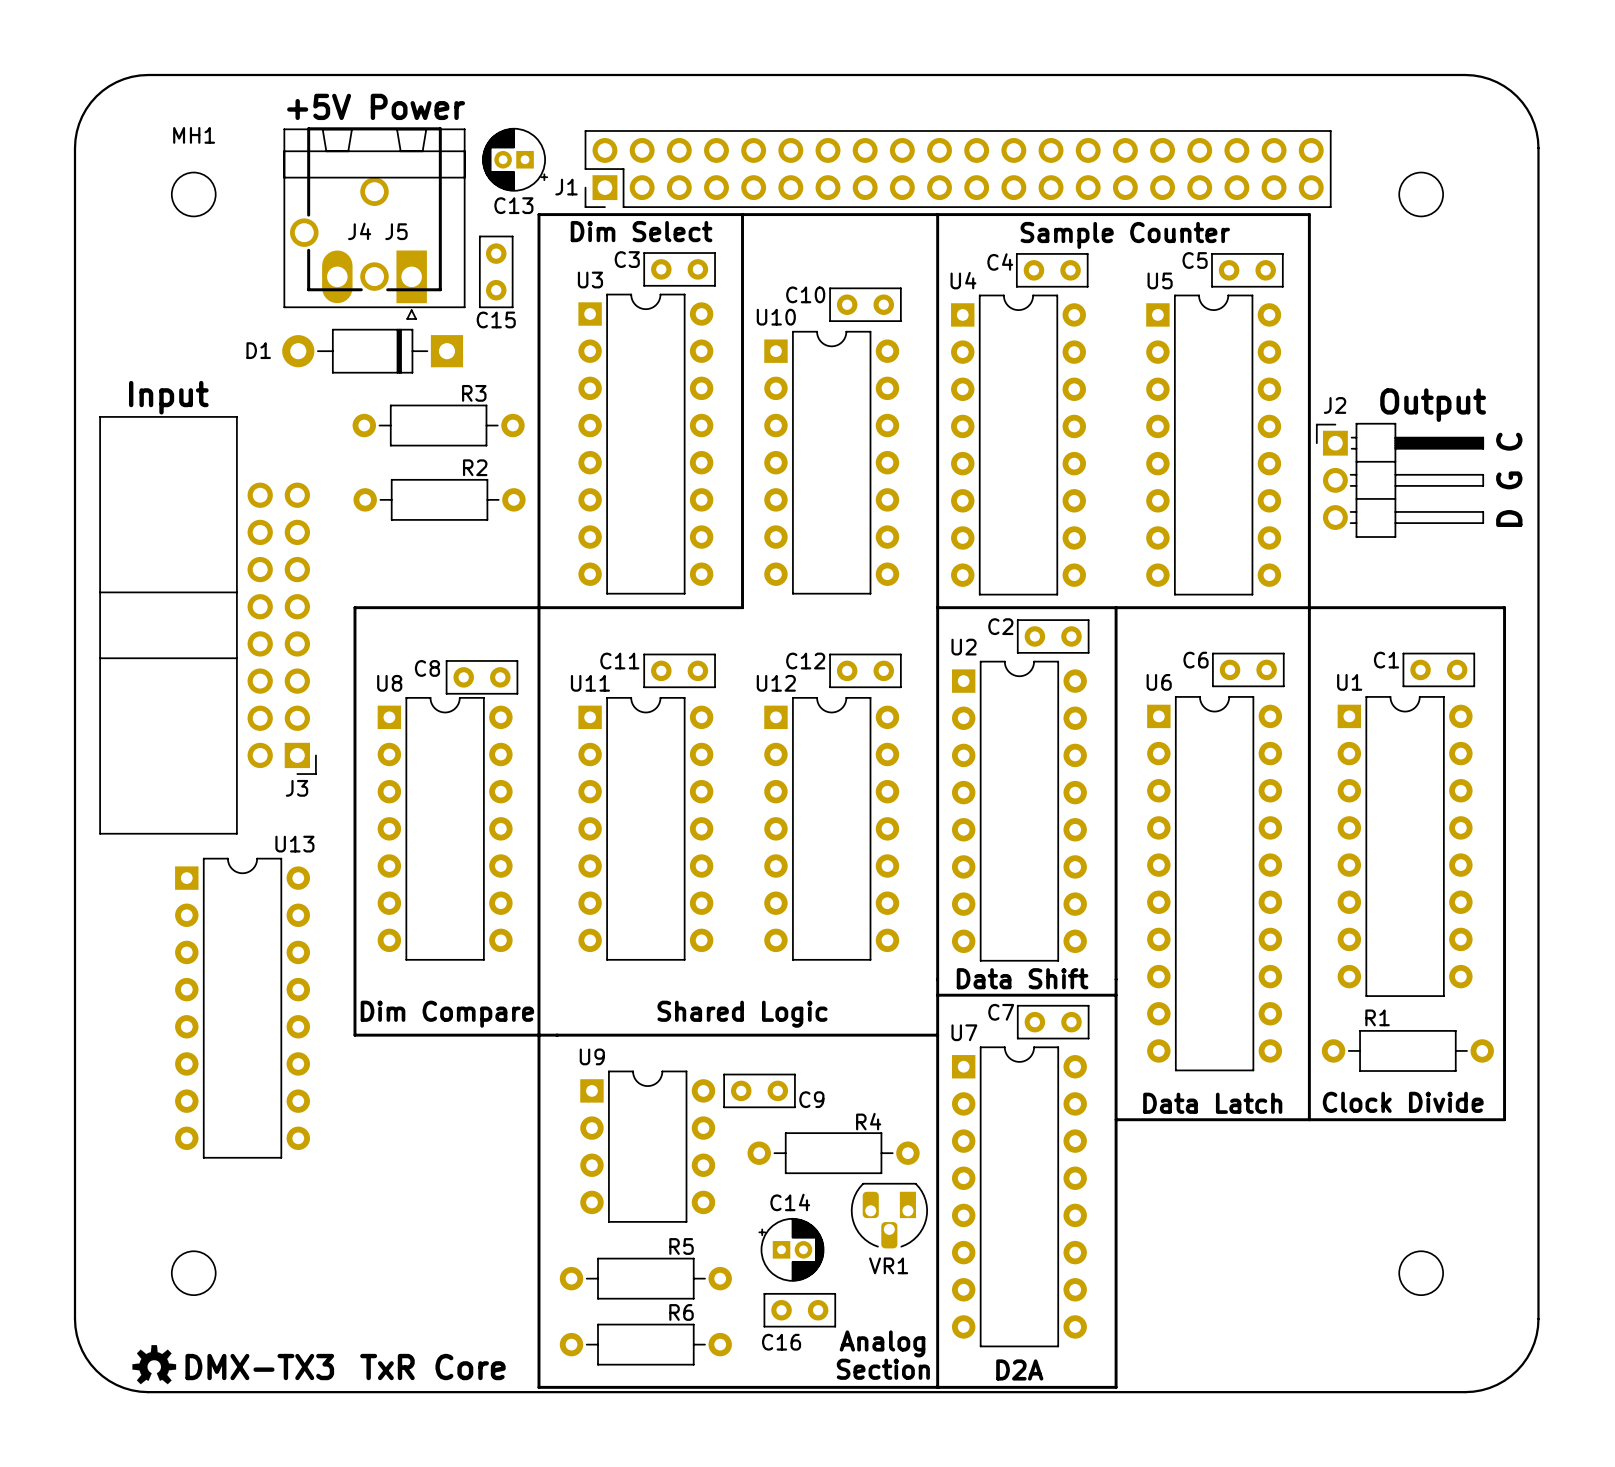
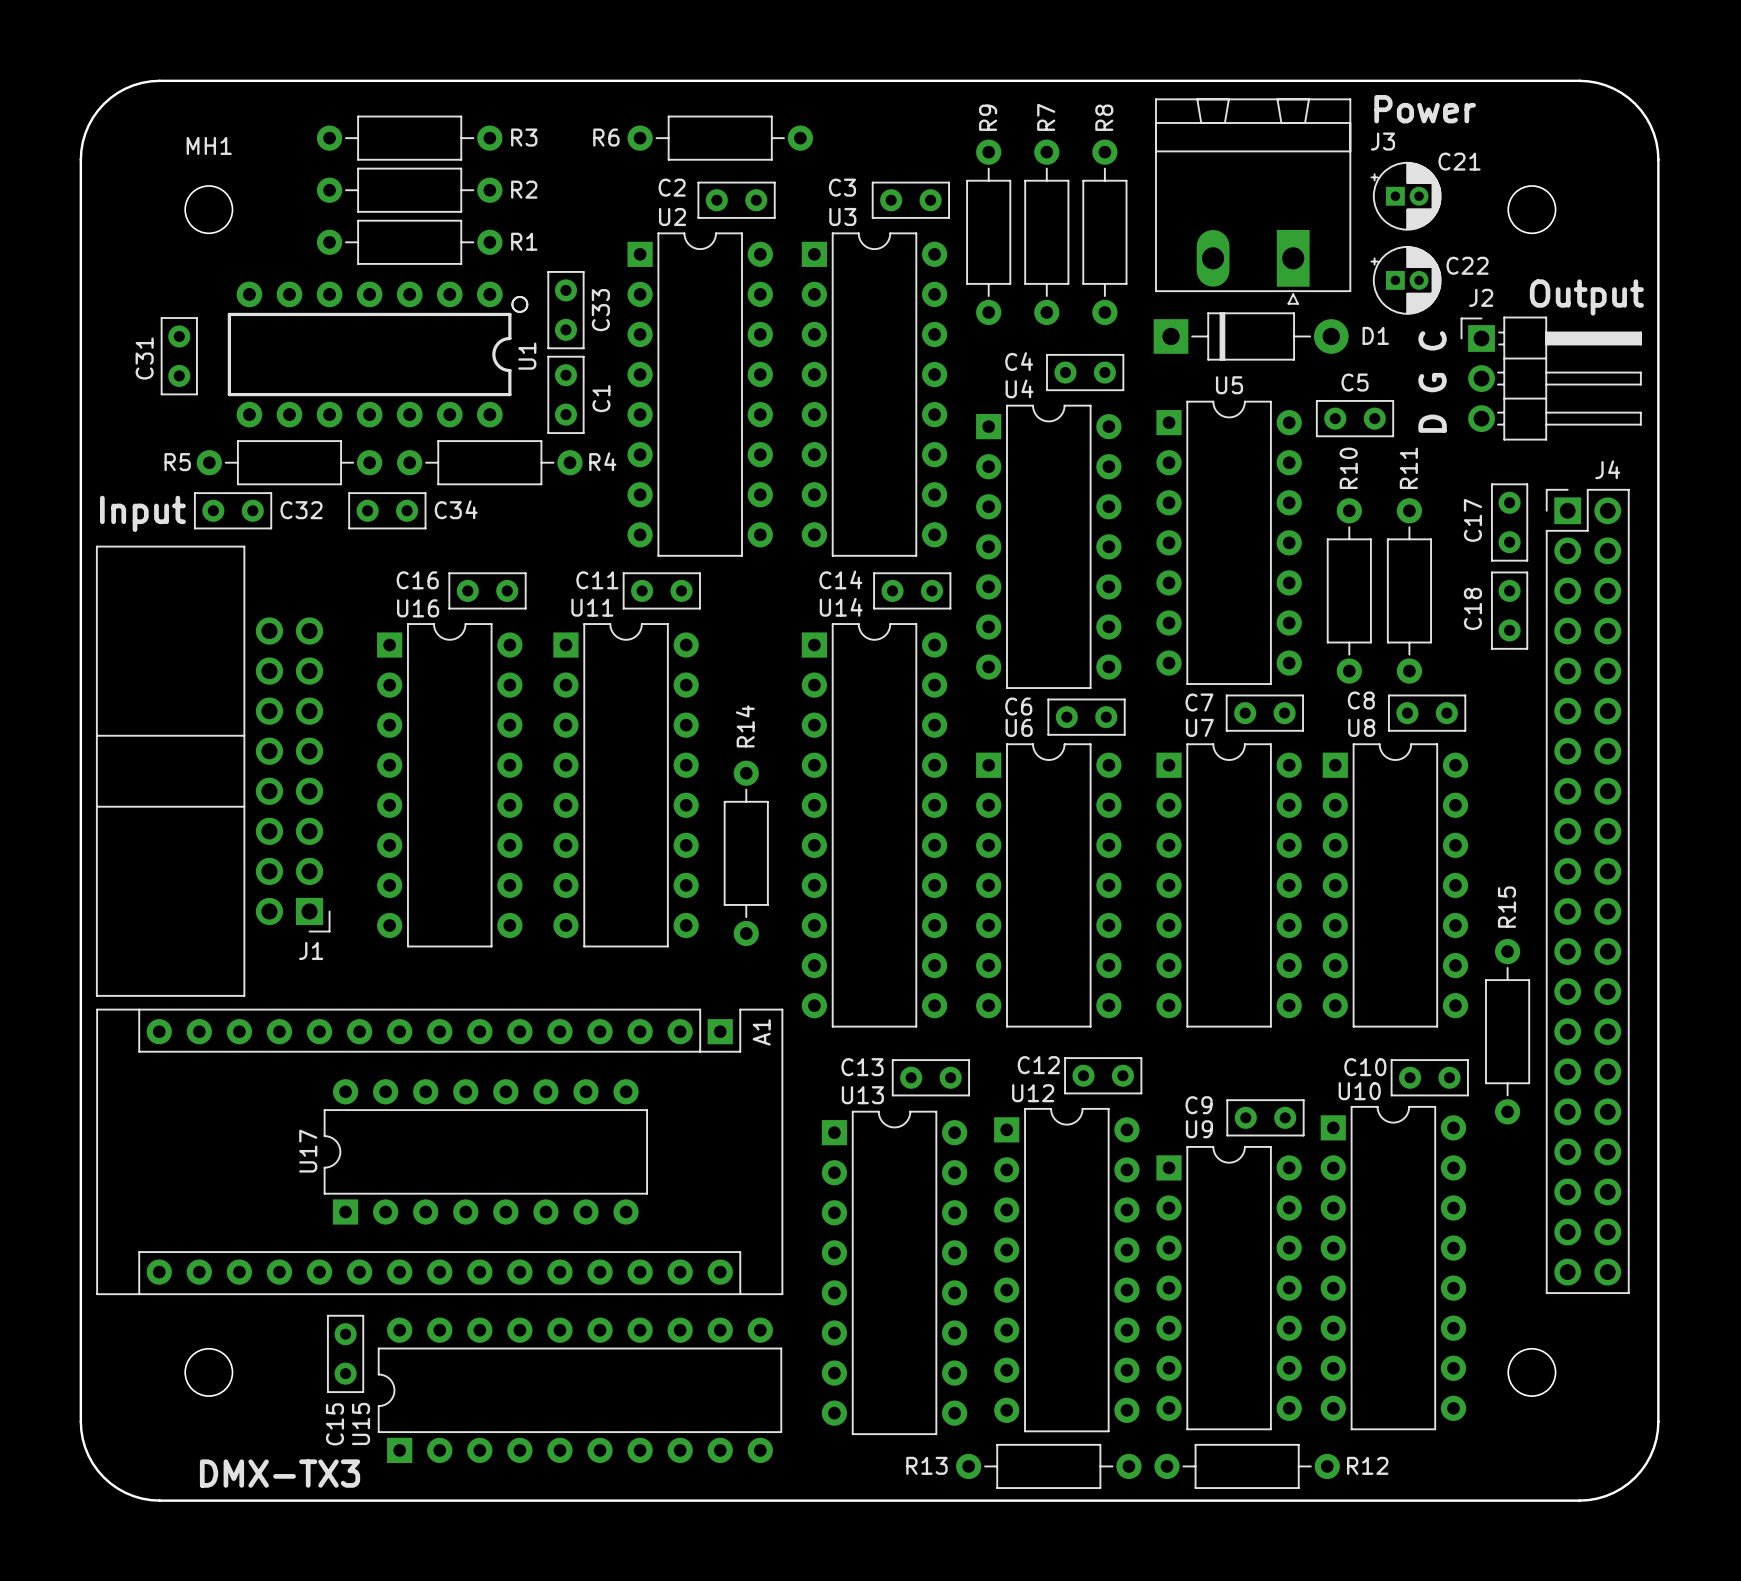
text: none -> Power (1425, 109)
text: +5V Power (376, 106) -> none
C13 footprint: [482, 127, 549, 192] -> [891, 1059, 971, 1097]
J4 footprint: [283, 128, 466, 320] -> [1545, 488, 1630, 1295]
J1 footprint: [584, 130, 1332, 208] -> [95, 545, 331, 997]
C21: none -> (1406, 196)
J1 name position: J1 (566, 187) -> J1 (311, 950)
C13 name position: C13 (513, 205) -> C13 (862, 1067)
J5: (365, 209) -> none
line: (742, 214) (742, 607) (354, 607) (354, 1035) (937, 1035) -> none
line: (937, 214) (937, 1387) (538, 1387) (538, 214) (1309, 214) (1309, 1119) -> none
R9: none -> (988, 232)
R7: none -> (1046, 232)
R8: none -> (1104, 232)
J4 name position: J4 (359, 231) -> J4 (1607, 469)
text: Dim Select (641, 231) -> none
text: Sample Counter (1125, 235) -> none
C3 name position: C3 (627, 259) -> C3 (842, 187)
C5 name position: C5 (1195, 260) -> C5 (1355, 382)
C22: none -> (1406, 280)
C4 name position: C4 (1000, 262) -> C4 (1019, 361)
C3 position: (679, 269) -> (910, 200)
C4 position: (1052, 270) -> (1085, 372)
C5 position: (1247, 270) -> (1355, 418)
C15 position: (496, 271) -> (345, 1353)
U3 name position: U3 (590, 280) -> U3 (842, 216)
U4 name position: U4 (963, 280) -> U4 (1019, 388)
U5 name position: U5 (1160, 280) -> U5 (1229, 385)
C33: none -> (565, 310)
U4 footprint: [951, 294, 1086, 596] -> [976, 404, 1122, 689]
U5 footprint: [1146, 294, 1282, 596] -> [1156, 400, 1302, 685]
C10 position: (865, 304) -> (1429, 1077)
U10 name position: U10 (776, 317) -> U10 (1359, 1091)
C15 name rotation: 0° (496, 319) -> 90° counterclockwise (334, 1424)
C31: none -> (179, 356)
U10 footprint: [764, 330, 900, 595] -> [1320, 1105, 1467, 1431]
D1 rotation: 0° (372, 351) -> 180° (1251, 336)
D1 position: (372, 351) -> (1251, 336)
R3 name position: R3 (474, 393) -> R3 (524, 137)
text position: Input (168, 397) -> Input (142, 513)
text position: Output (1433, 405) -> Output (1586, 297)
J3 footprint: [99, 416, 317, 835] -> [1155, 98, 1352, 305]
R3 position: (438, 425) -> (409, 138)
U3 position: (645, 444) -> (874, 394)
R2 name position: R2 (475, 467) -> R2 (524, 189)
C32: none -> (233, 510)
C34: none -> (387, 510)
text position: D G C (1509, 479) -> D G C (1432, 382)
J2 position: (1400, 480) -> (1551, 378)
C17: none -> (1509, 522)
R2 position: (439, 499) -> (409, 190)
R10: none -> (1349, 590)
R11: none -> (1409, 590)
C18: none -> (1509, 610)
line: (937, 607) (1504, 607) (1504, 1119) (1116, 1119) -> none
line: (1116, 607) (1116, 1387) (937, 1386) -> none
C2 name position: C2 (1000, 626) -> C2 (672, 187)
C2 position: (1053, 636) -> (736, 200)
U2 name position: U2 (964, 647) -> U2 (672, 216)
C6 name position: C6 (1196, 660) -> C6 (1018, 706)
C1 name position: C1 (1386, 660) -> C1 (601, 398)
C8 name position: C8 (427, 668) -> C8 (1361, 700)
C6 position: (1248, 669) -> (1086, 717)
C1 rotation: 0° (1438, 669) -> 90° clockwise (565, 394)
C1 position: (1438, 669) -> (565, 394)
C11 position: (679, 670) -> (661, 590)
C12 position: (865, 670) -> (1103, 1075)
C8 position: (482, 677) -> (1427, 713)
U6 name position: U6 (1159, 682) -> U6 (1019, 727)
U1 name position: U1 (1349, 682) -> U1 (527, 356)
U8 name position: U8 (389, 683) -> U8 (1361, 727)
U11 name position: U11 (590, 683) -> U11 (592, 607)
U12 name position: U12 (776, 683) -> U12 (1033, 1093)
U11 footprint: [578, 696, 714, 961] -> [553, 623, 699, 948]
U12 footprint: [764, 696, 900, 961] -> [994, 1107, 1140, 1433]
U6 footprint: [1147, 696, 1283, 1072] -> [976, 743, 1122, 1028]
U1 footprint: [1337, 696, 1473, 997] -> [227, 281, 529, 428]
U16: none -> (449, 785)
U14: none -> (874, 825)
J3 name position: J3 (297, 788) -> J3 (1383, 141)
R14: none -> (746, 853)
U2 position: (1019, 811) -> (700, 394)
U8 position: (445, 828) -> (1395, 885)
U13 name position: U13 (294, 844) -> U13 (862, 1095)
R15: none -> (1507, 1031)
text: Data Shift (1022, 978) -> none
line: (937, 995) (1116, 995) -> none
U13 position: (242, 1008) -> (894, 1272)
C7 name position: C7 (1001, 1012) -> C7 (1199, 702)
text: Dim Compare (447, 1014) -> none
text: Shared Logic (742, 1014) -> none
R1 name position: R1 (1377, 1017) -> R1 (524, 241)
C7 position: (1053, 1022) -> (1264, 713)
U7 name position: U7 (964, 1032) -> U7 (1199, 727)
U7 footprint: [951, 1046, 1087, 1348] -> [1156, 743, 1302, 1028]
R1 position: (1407, 1050) -> (409, 242)
U9 name position: U9 (592, 1056) -> U9 (1199, 1129)
A1: none -> (439, 1151)
U17: none -> (485, 1151)
U9 footprint: [580, 1070, 716, 1223] -> [1156, 1145, 1302, 1431]
C9 position: (759, 1090) -> (1265, 1117)
C9 name position: C9 (811, 1099) -> C9 (1199, 1105)
text: Clock Divide (1403, 1102) -> none
text: Data Latch (1212, 1103) -> none
R4 name position: R4 (868, 1121) -> R4 (602, 461)
R4 position: (833, 1153) -> (489, 462)
C14 name position: C14 (790, 1202) -> C14 (840, 579)
VR1: (889, 1215) -> none
C14 footprint: [758, 1217, 825, 1282] -> [873, 572, 952, 610]
R5 name position: R5 (681, 1246) -> R5 (177, 462)
R5 position: (645, 1278) -> (289, 462)
U15: none -> (579, 1390)
C16 position: (799, 1310) -> (487, 590)
R6 name position: R6 (681, 1312) -> R6 (606, 137)
C16 name position: C16 (781, 1342) -> C16 (417, 580)
text: Analog (882, 1343) -> none
R6 position: (645, 1344) -> (720, 138)
drawing: [132, 1345, 177, 1385] -> none
R13: none -> (1048, 1466)
R12: none -> (1247, 1466)
text: TxR Core (432, 1367) -> none
text: Section (883, 1369) -> none
text: D2A (1019, 1369) -> none

